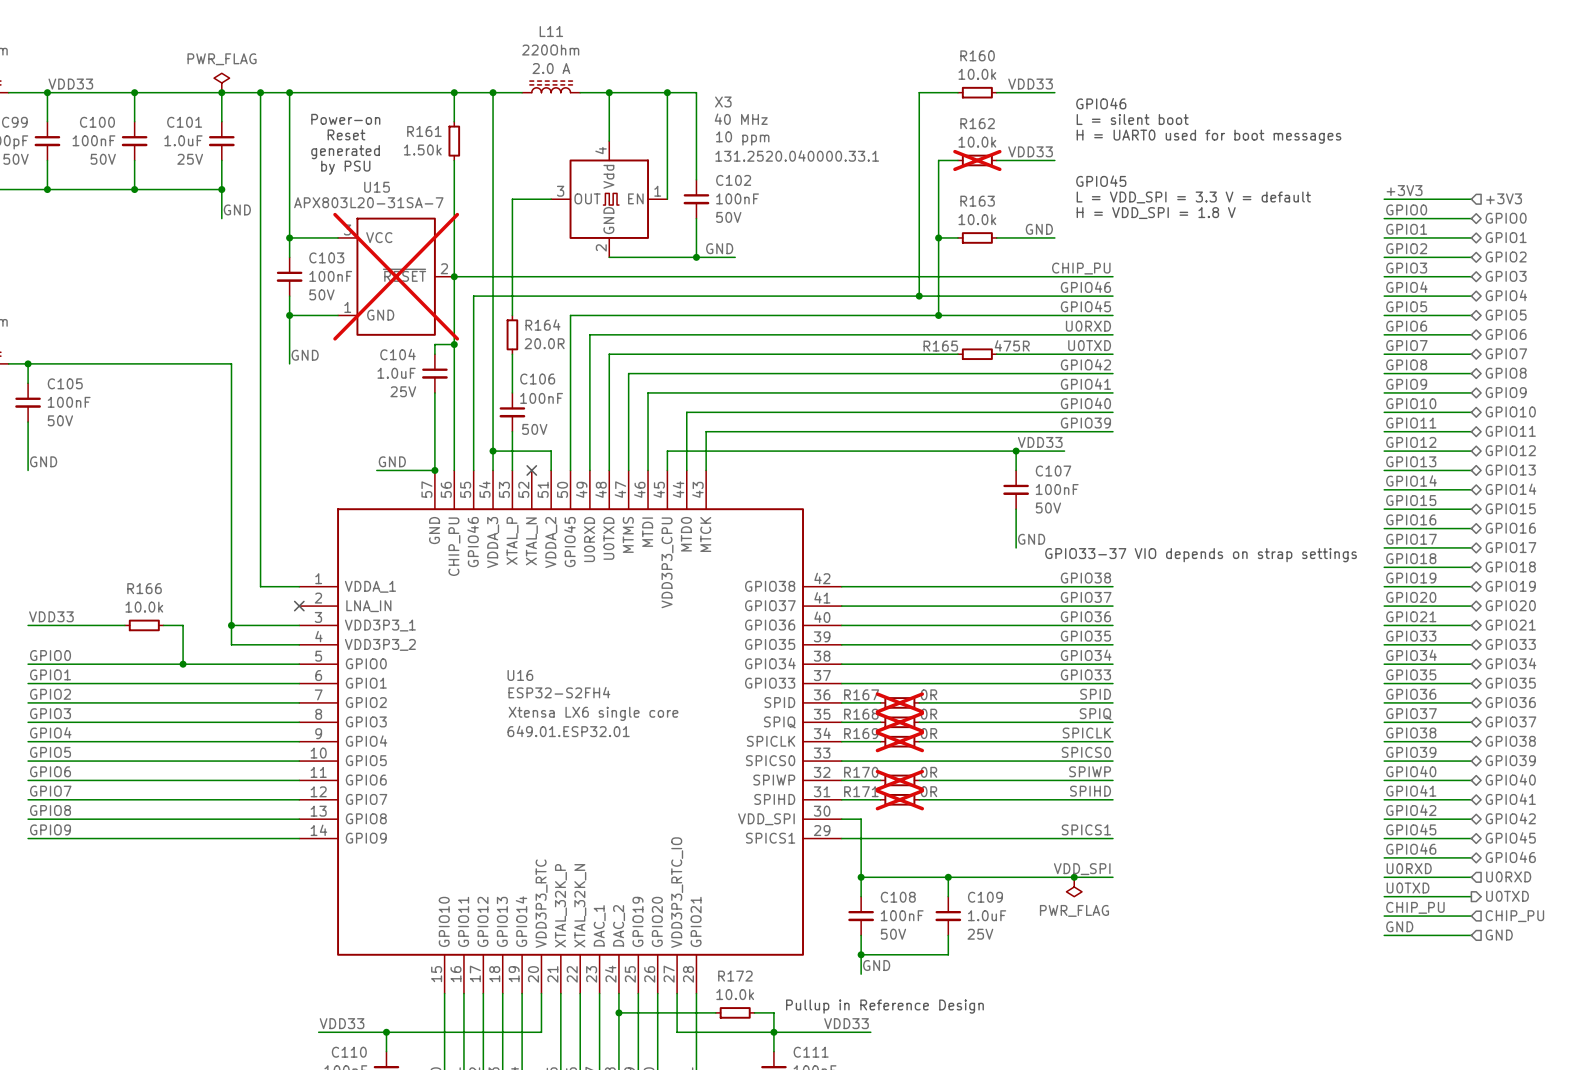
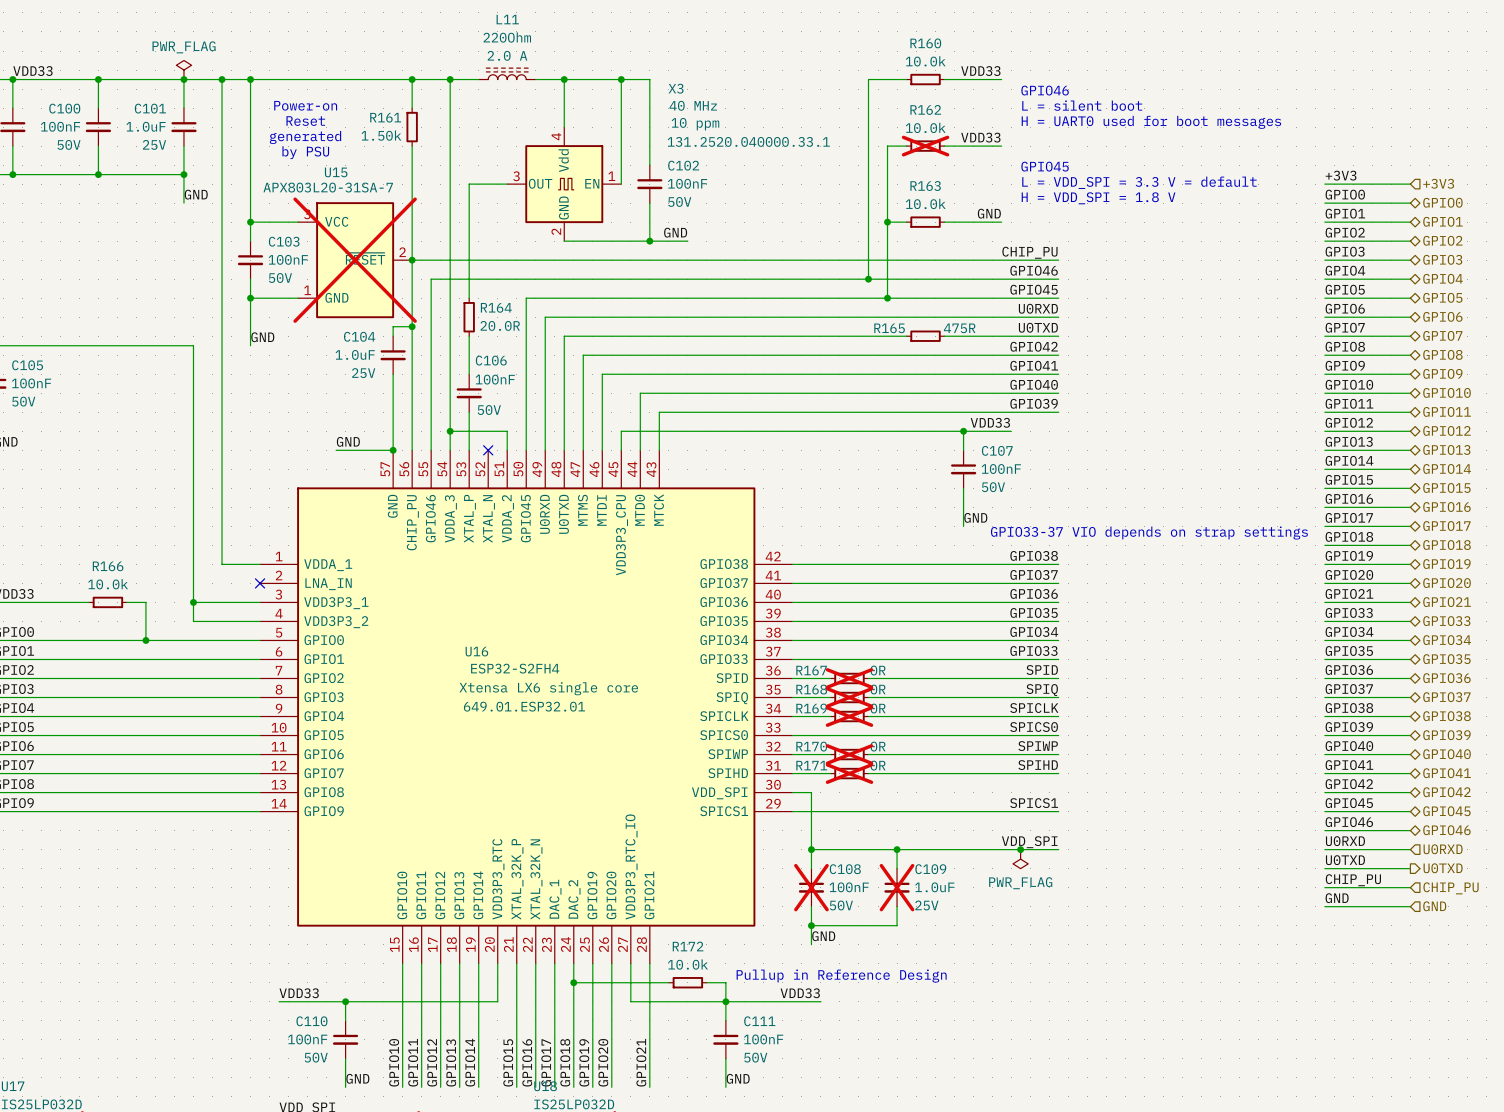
C108 do-not-place cross: none -> (811, 887)
C109 do-not-place cross: none -> (897, 887)

